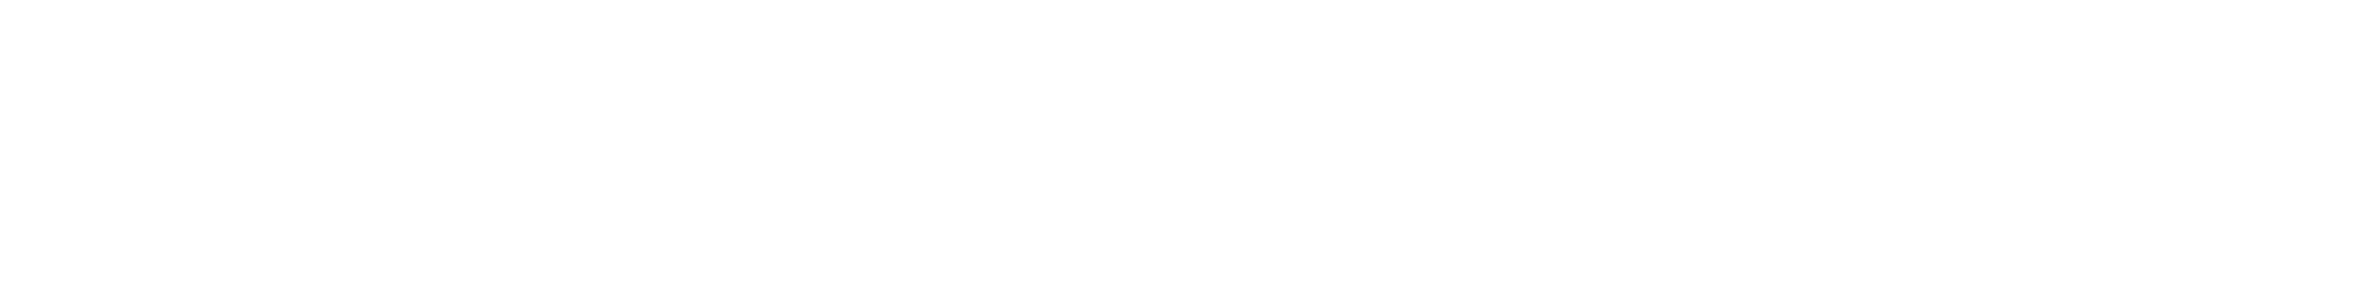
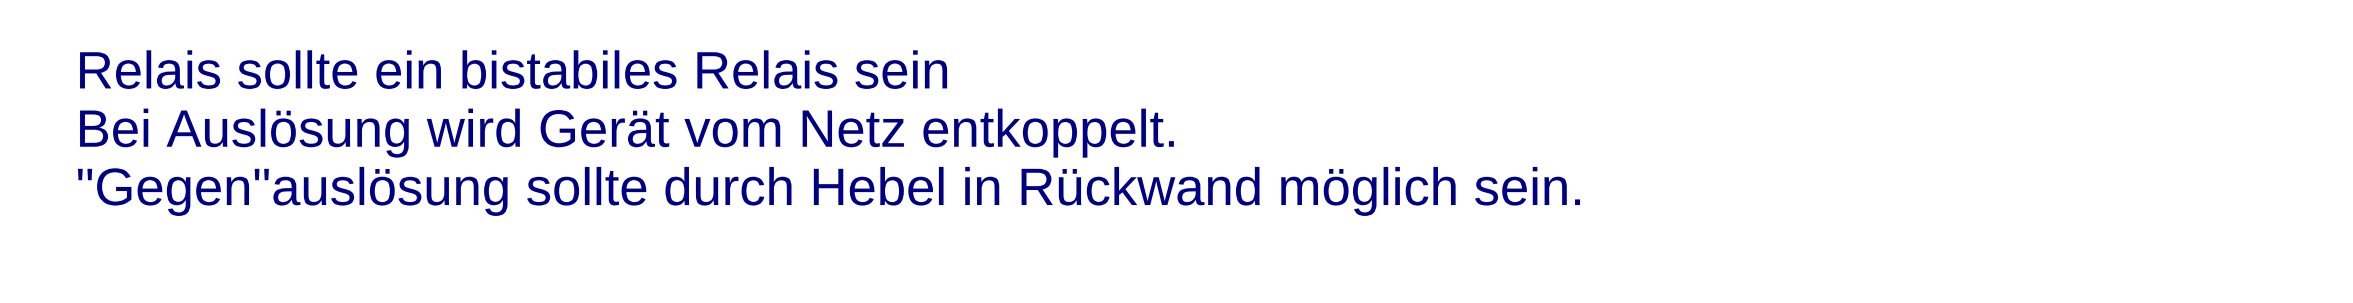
text: none -> Relais sollte ein bistabiles Relais sein (513, 69)
text: none -> Bei Auslösung wird Gerät vom Netz entkoppelt. (626, 133)
text: none -> "Gegen"auslösung sollte durch Hebel in Rückwand möglich sein. (829, 191)

